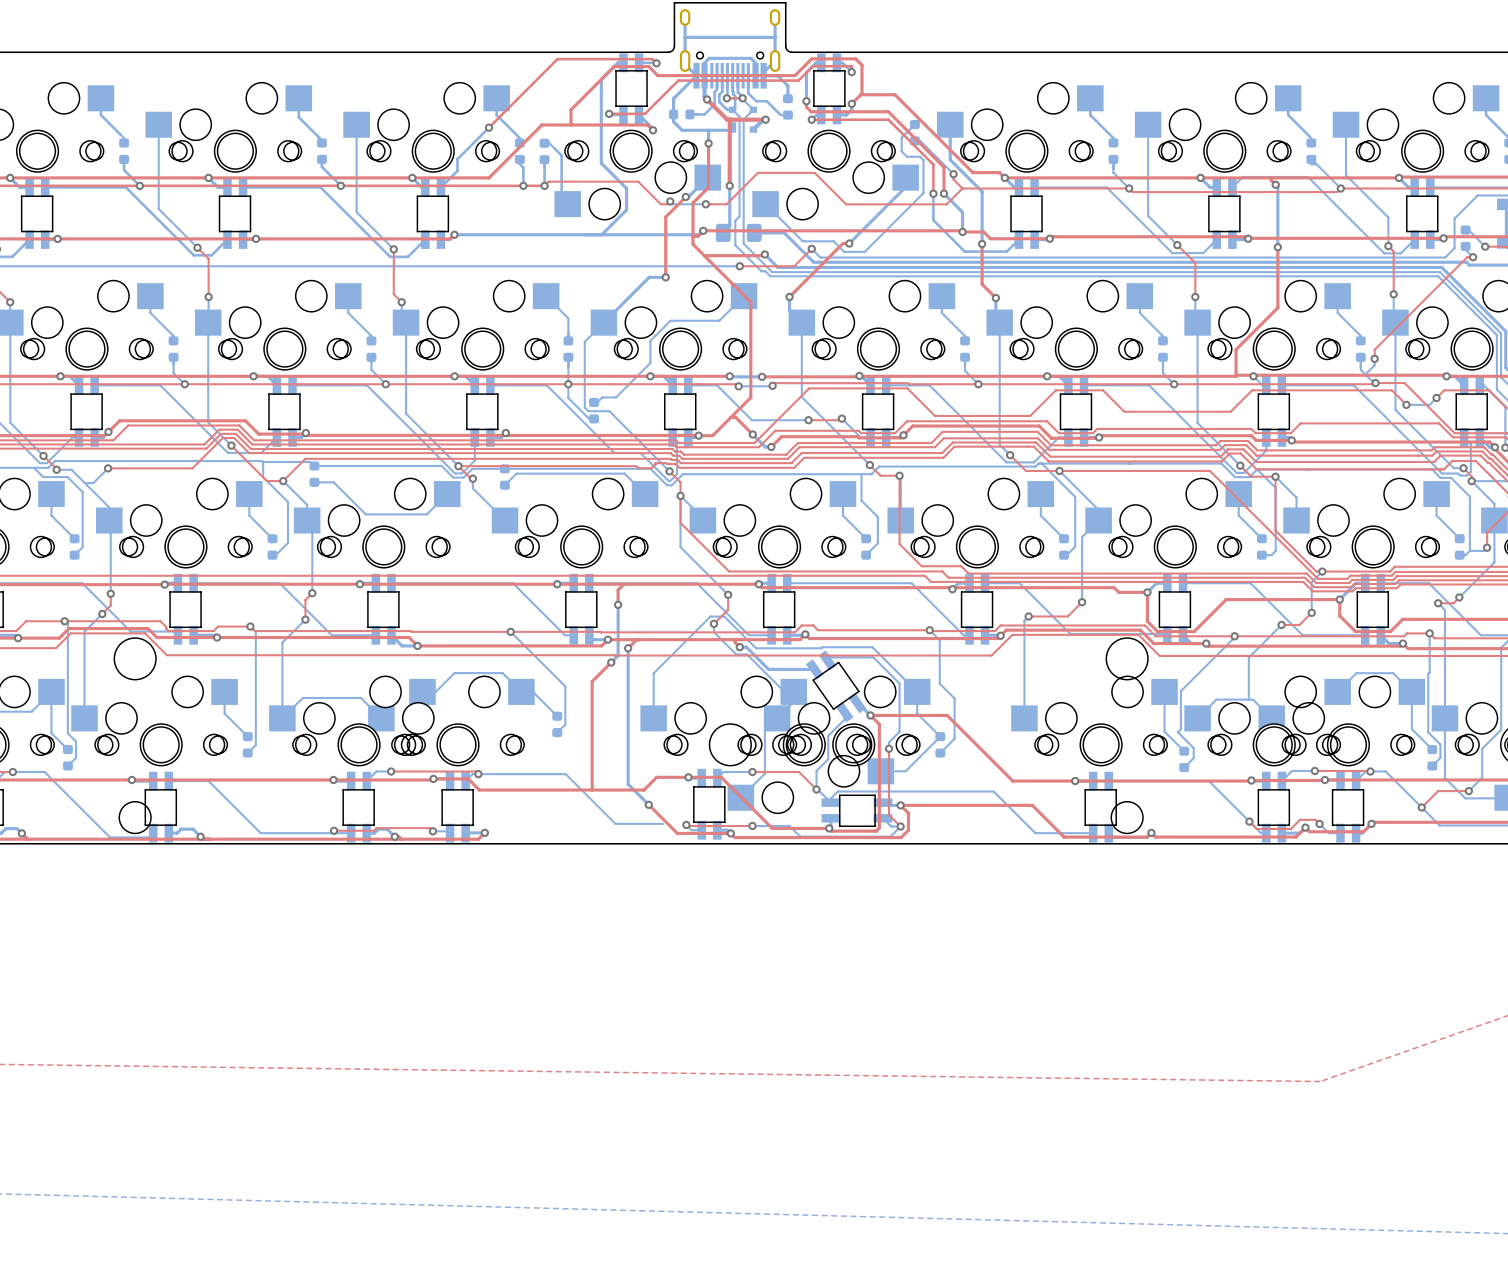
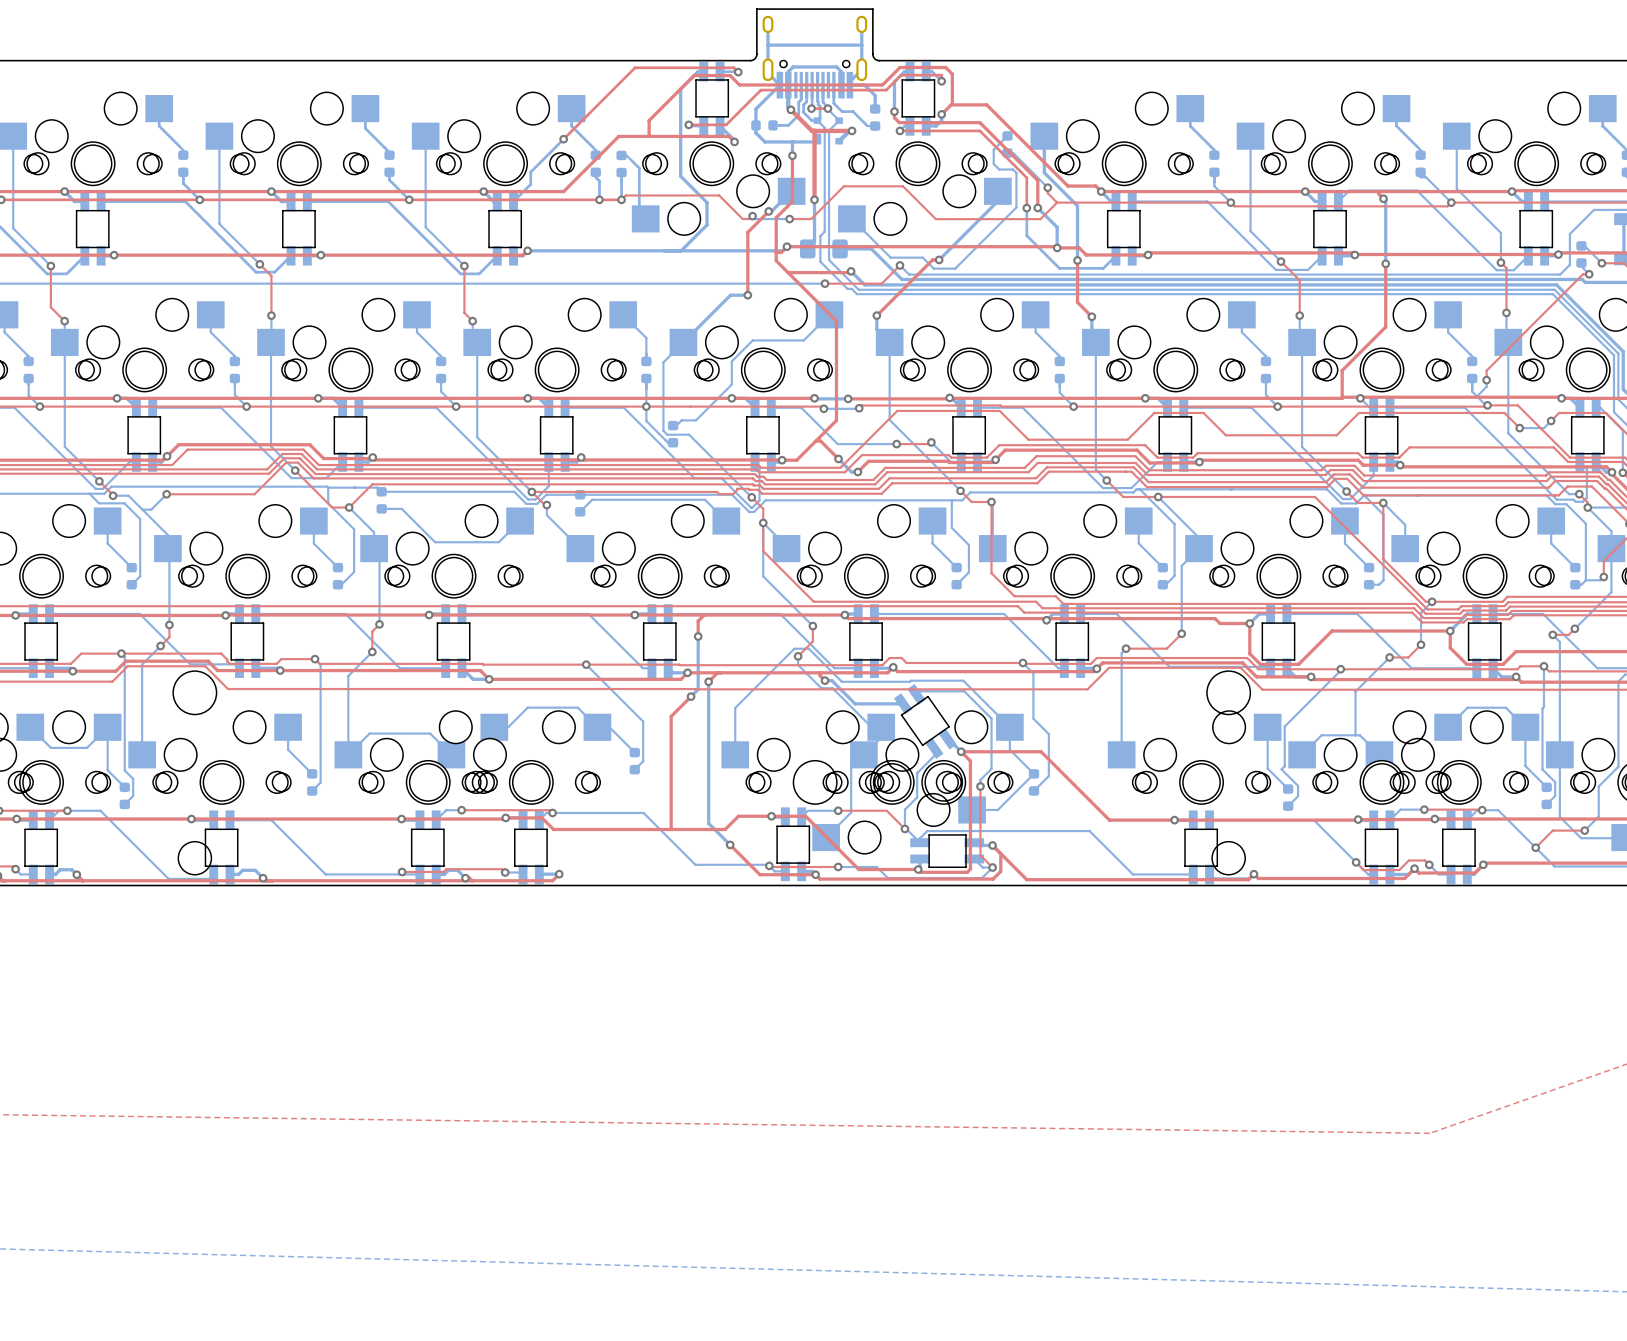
top track: (900, 805) (1032, 805) (1064, 837) (1147, 837) -> (1000, 853) (1026, 879) (1249, 878)
bottom track: none -> (745, 864) (769, 865)

